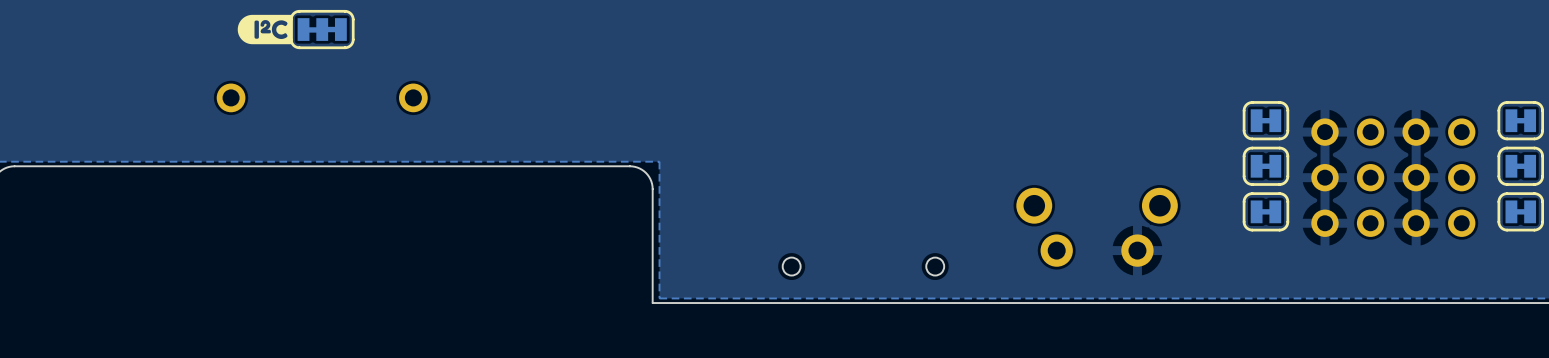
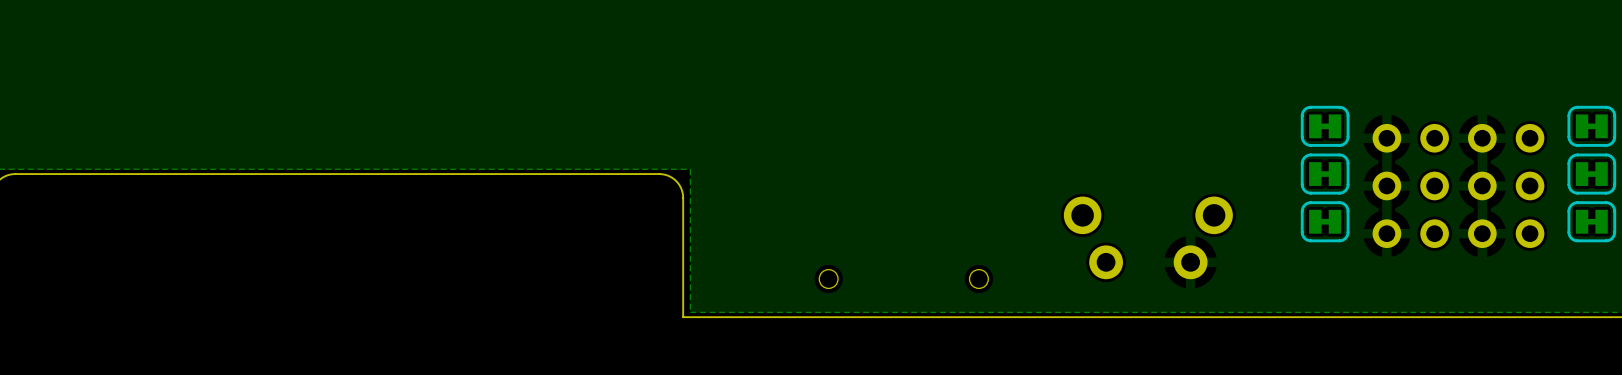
drawing: [237, 14, 293, 45] -> none
part: (322, 29) -> none
part: (231, 97) -> none
part: (413, 97) -> none

